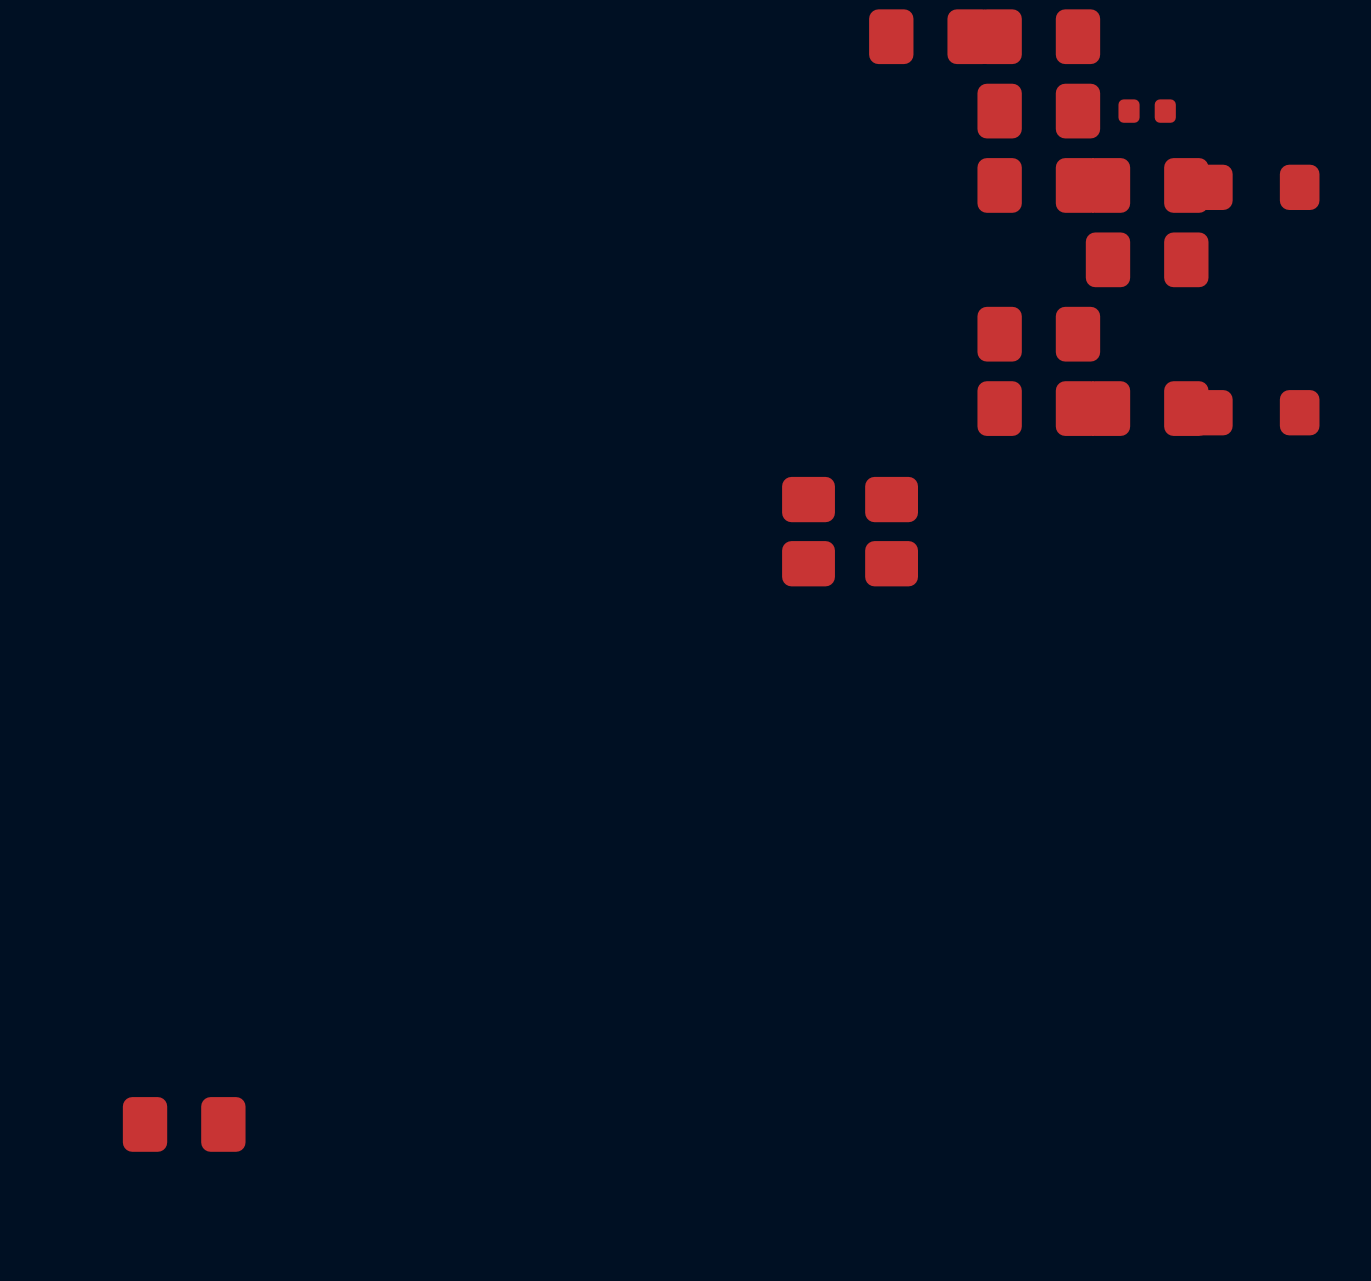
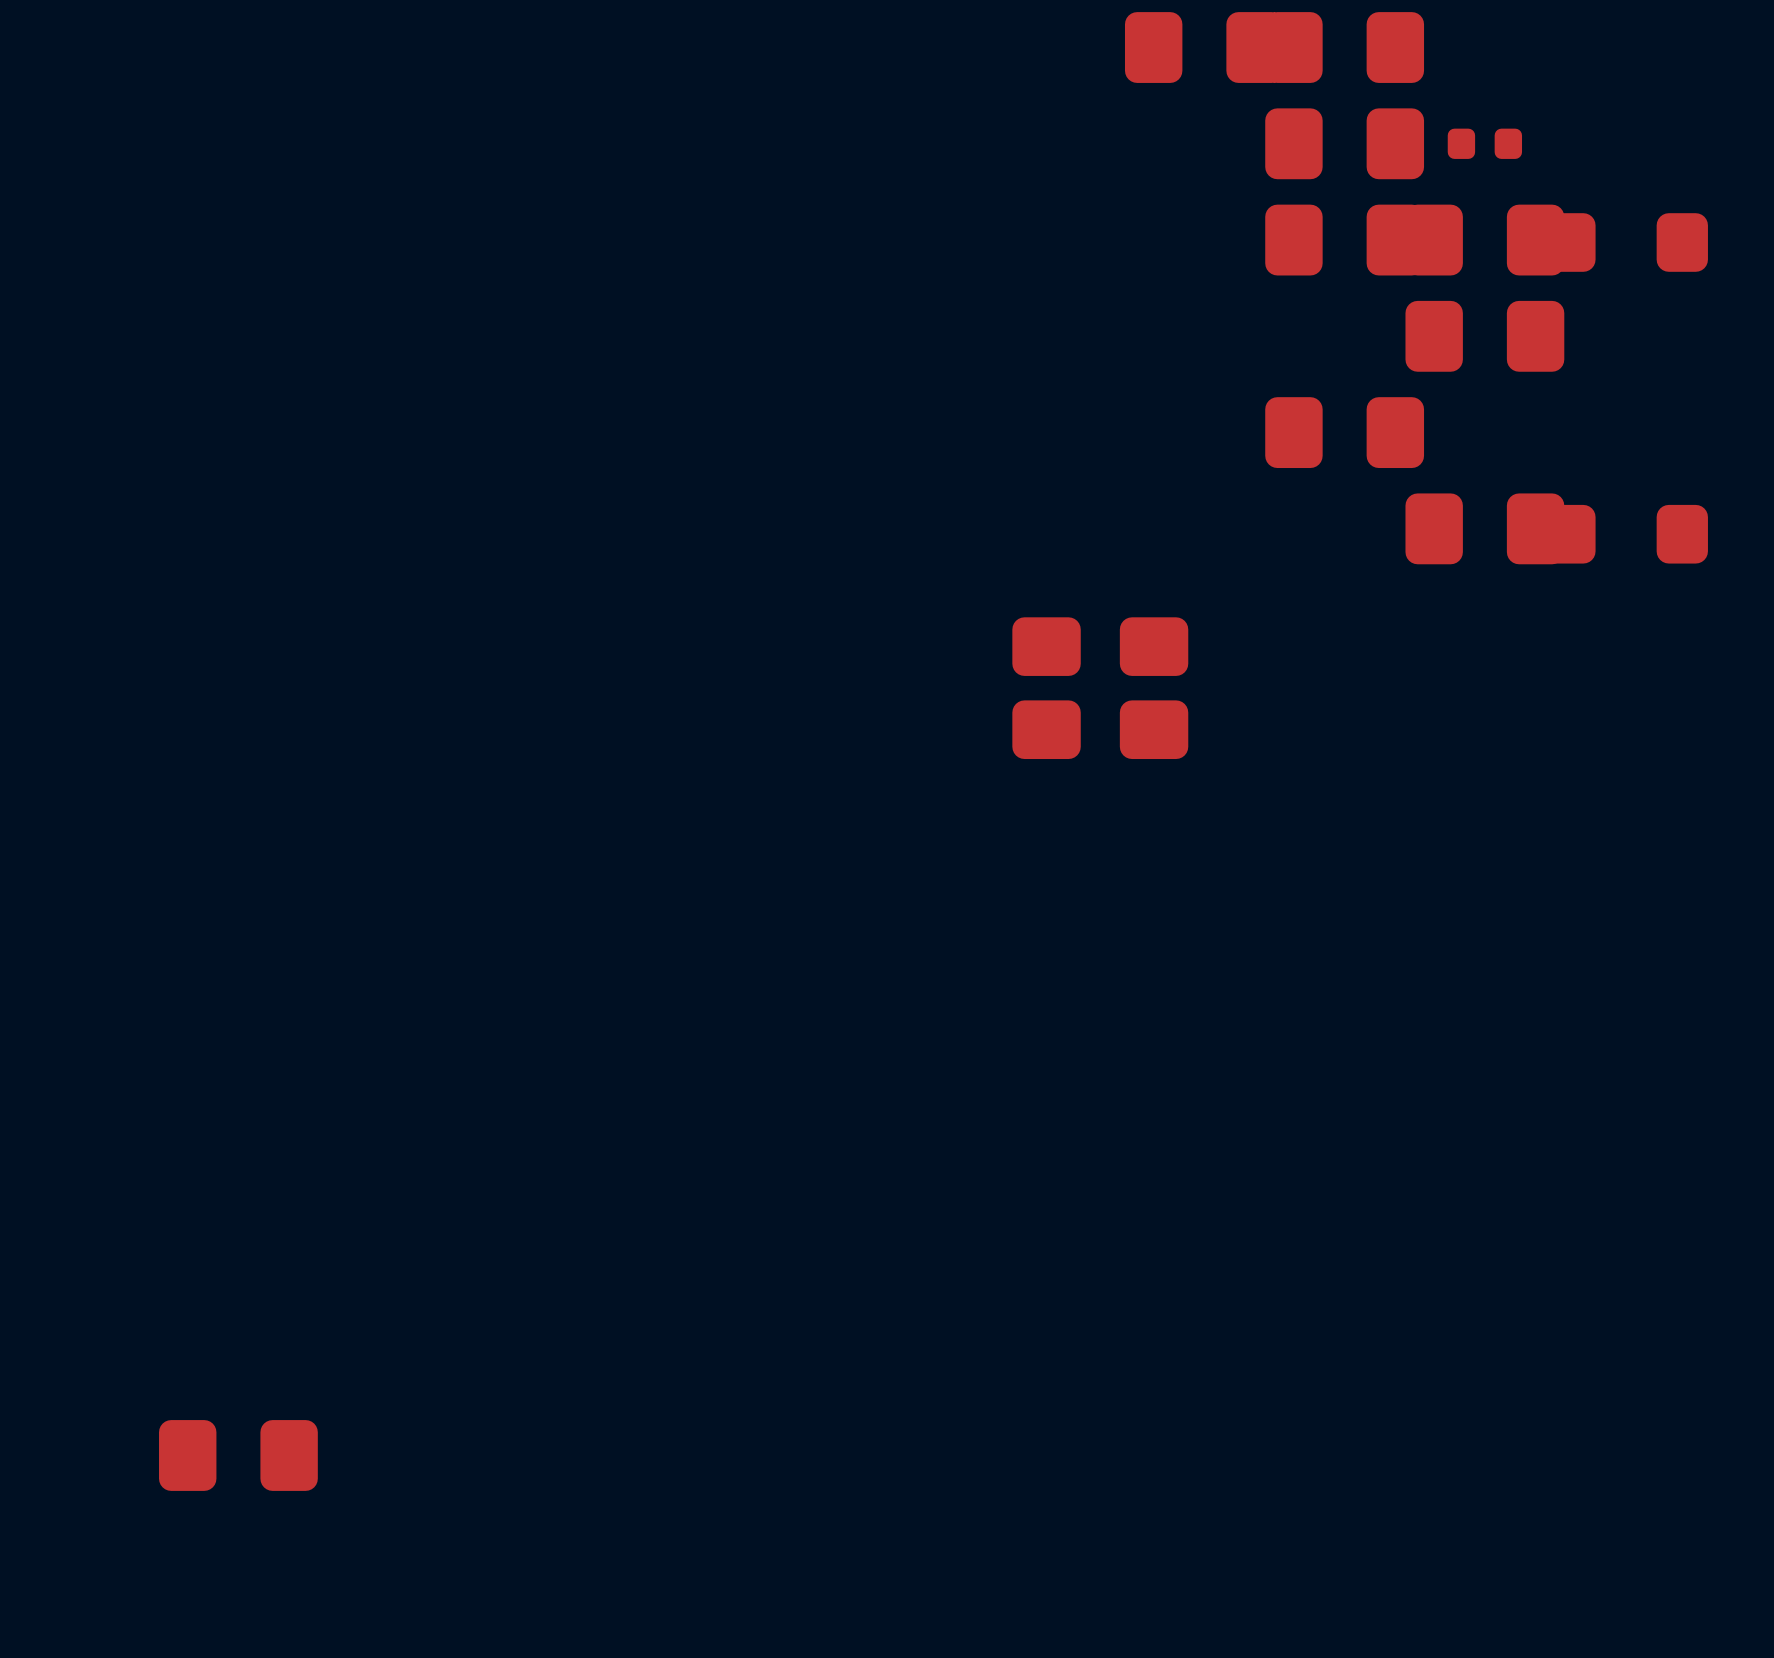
part: (1038, 408) -> none

